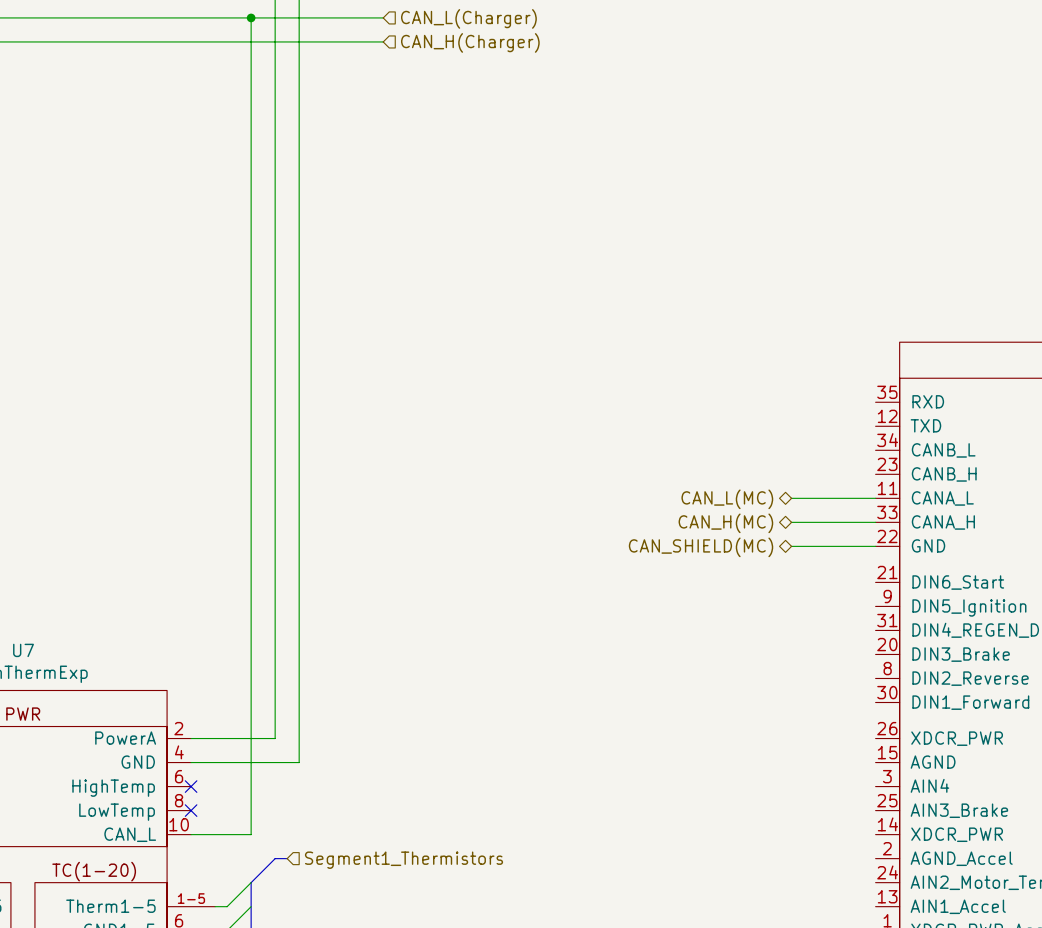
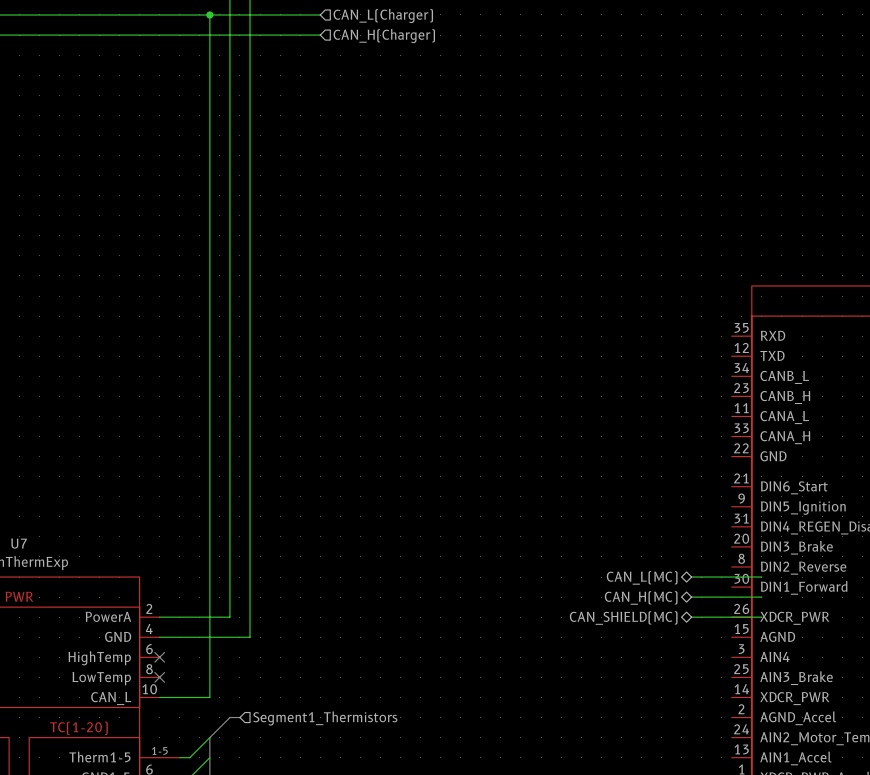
wire: (791, 498) (875, 498) -> (691, 577) (761, 577)
hierarchical label position: CAN_L(MC) (727, 499) -> CAN_L(MC) (642, 577)
wire: (791, 522) (875, 522) -> (691, 597) (761, 597)
hierarchical label position: CAN_H(MC) (725, 523) -> CAN_H(MC) (641, 597)
wire: (791, 546) (875, 546) -> (691, 617) (761, 617)
hierarchical label position: CAN_SHIELD(MC) (701, 547) -> CAN_SHIELD(MC) (623, 618)

